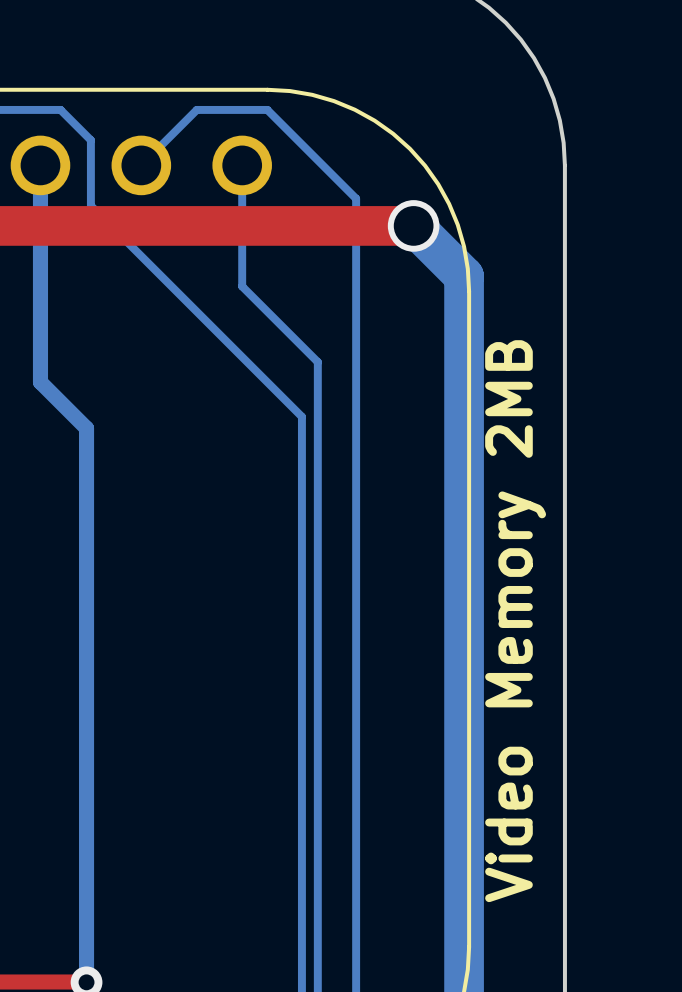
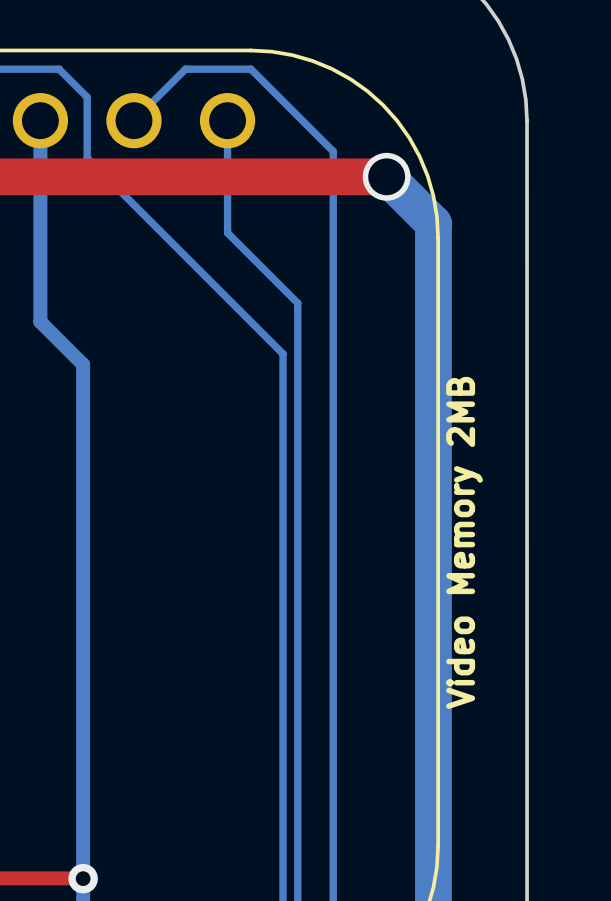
part text: none -> Video Memory 2MB (464, 542)
part text: Video Memory 2MB (515, 621) -> none

